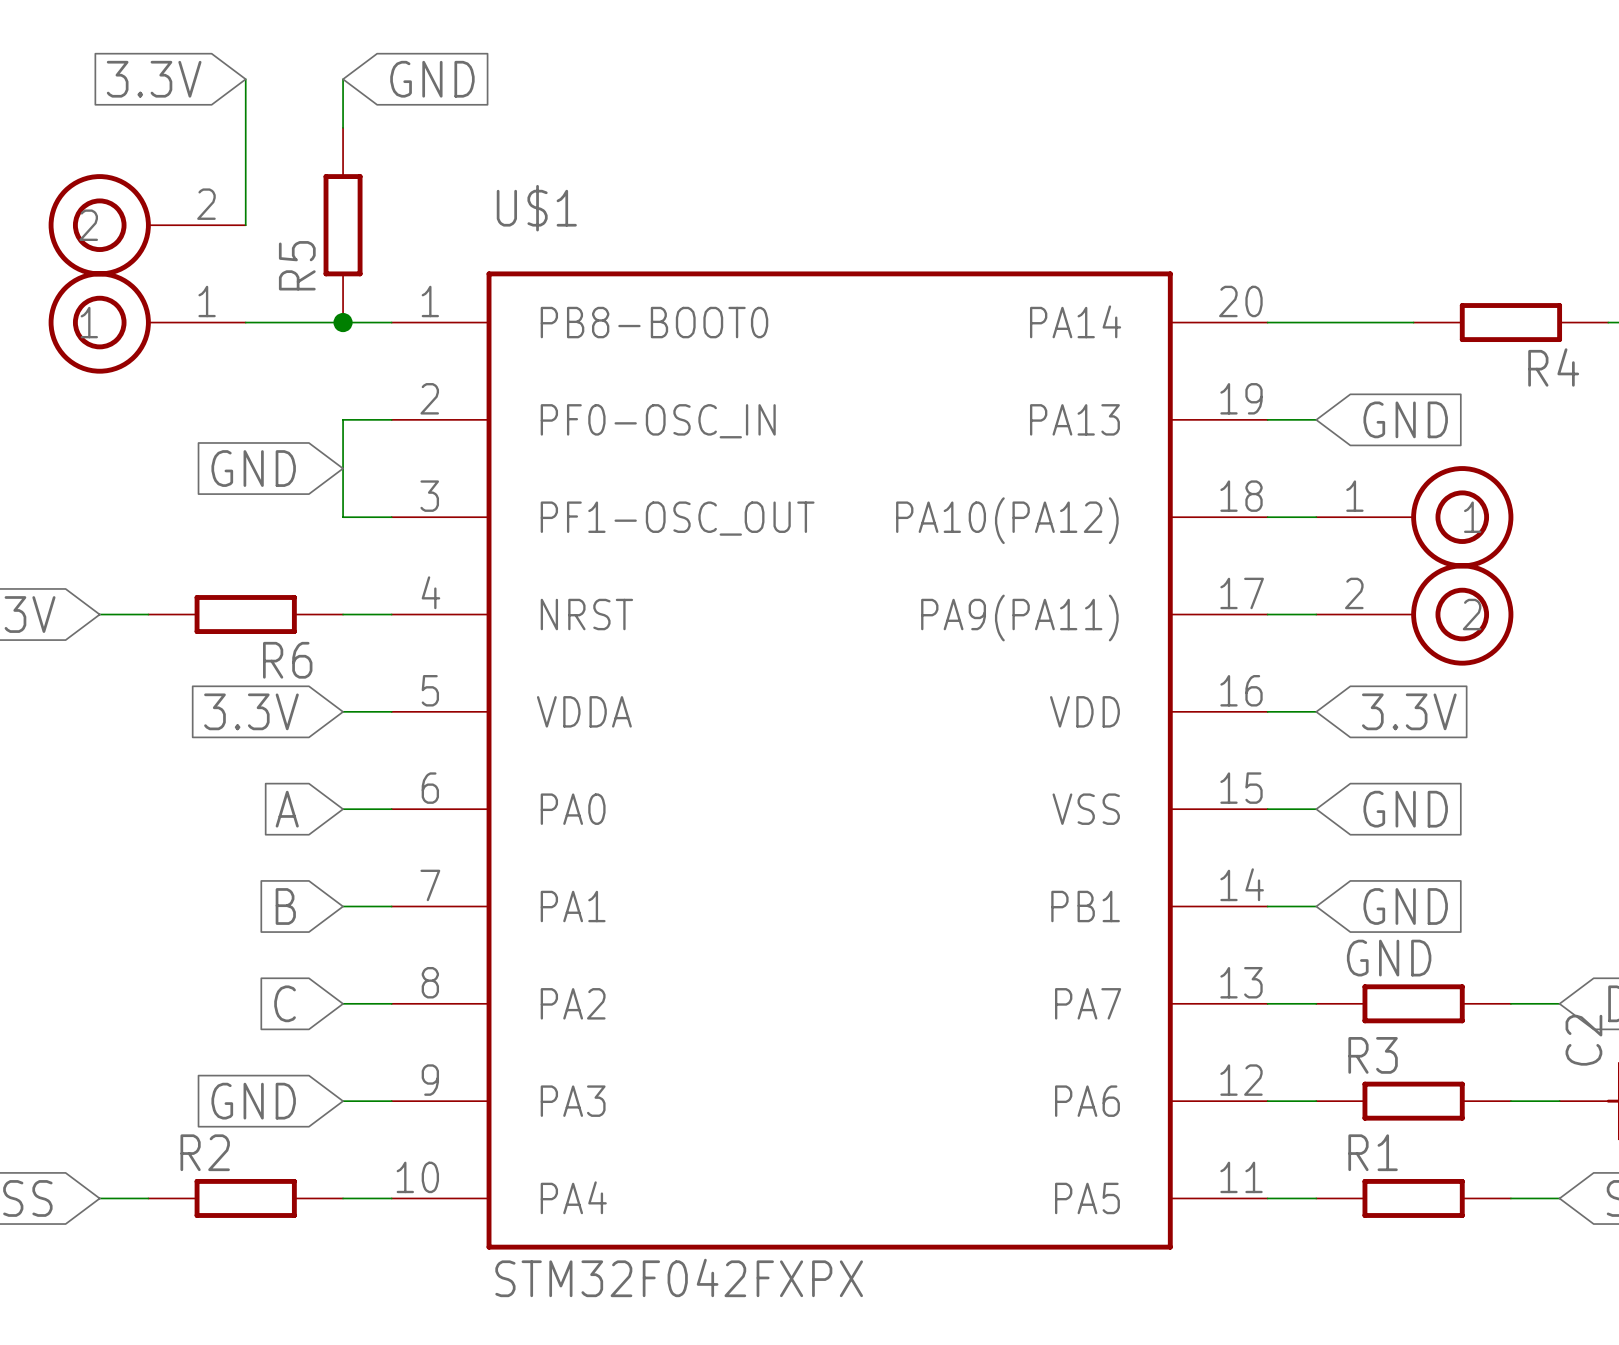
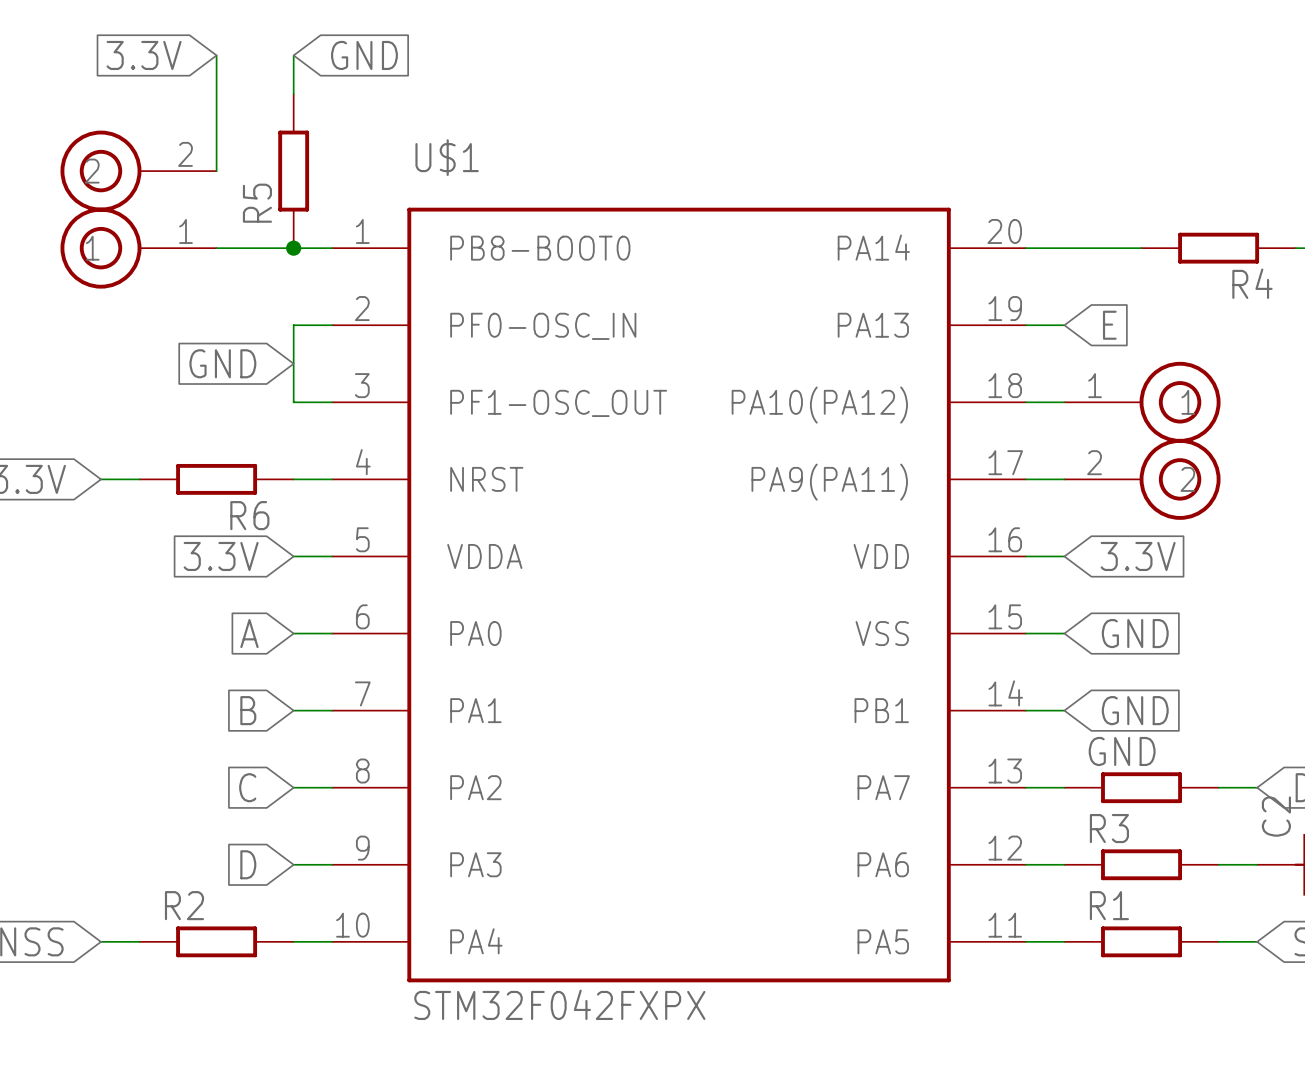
global label: GND (1405, 419) -> E (1109, 325)
global label: GND (253, 1101) -> D (248, 864)

